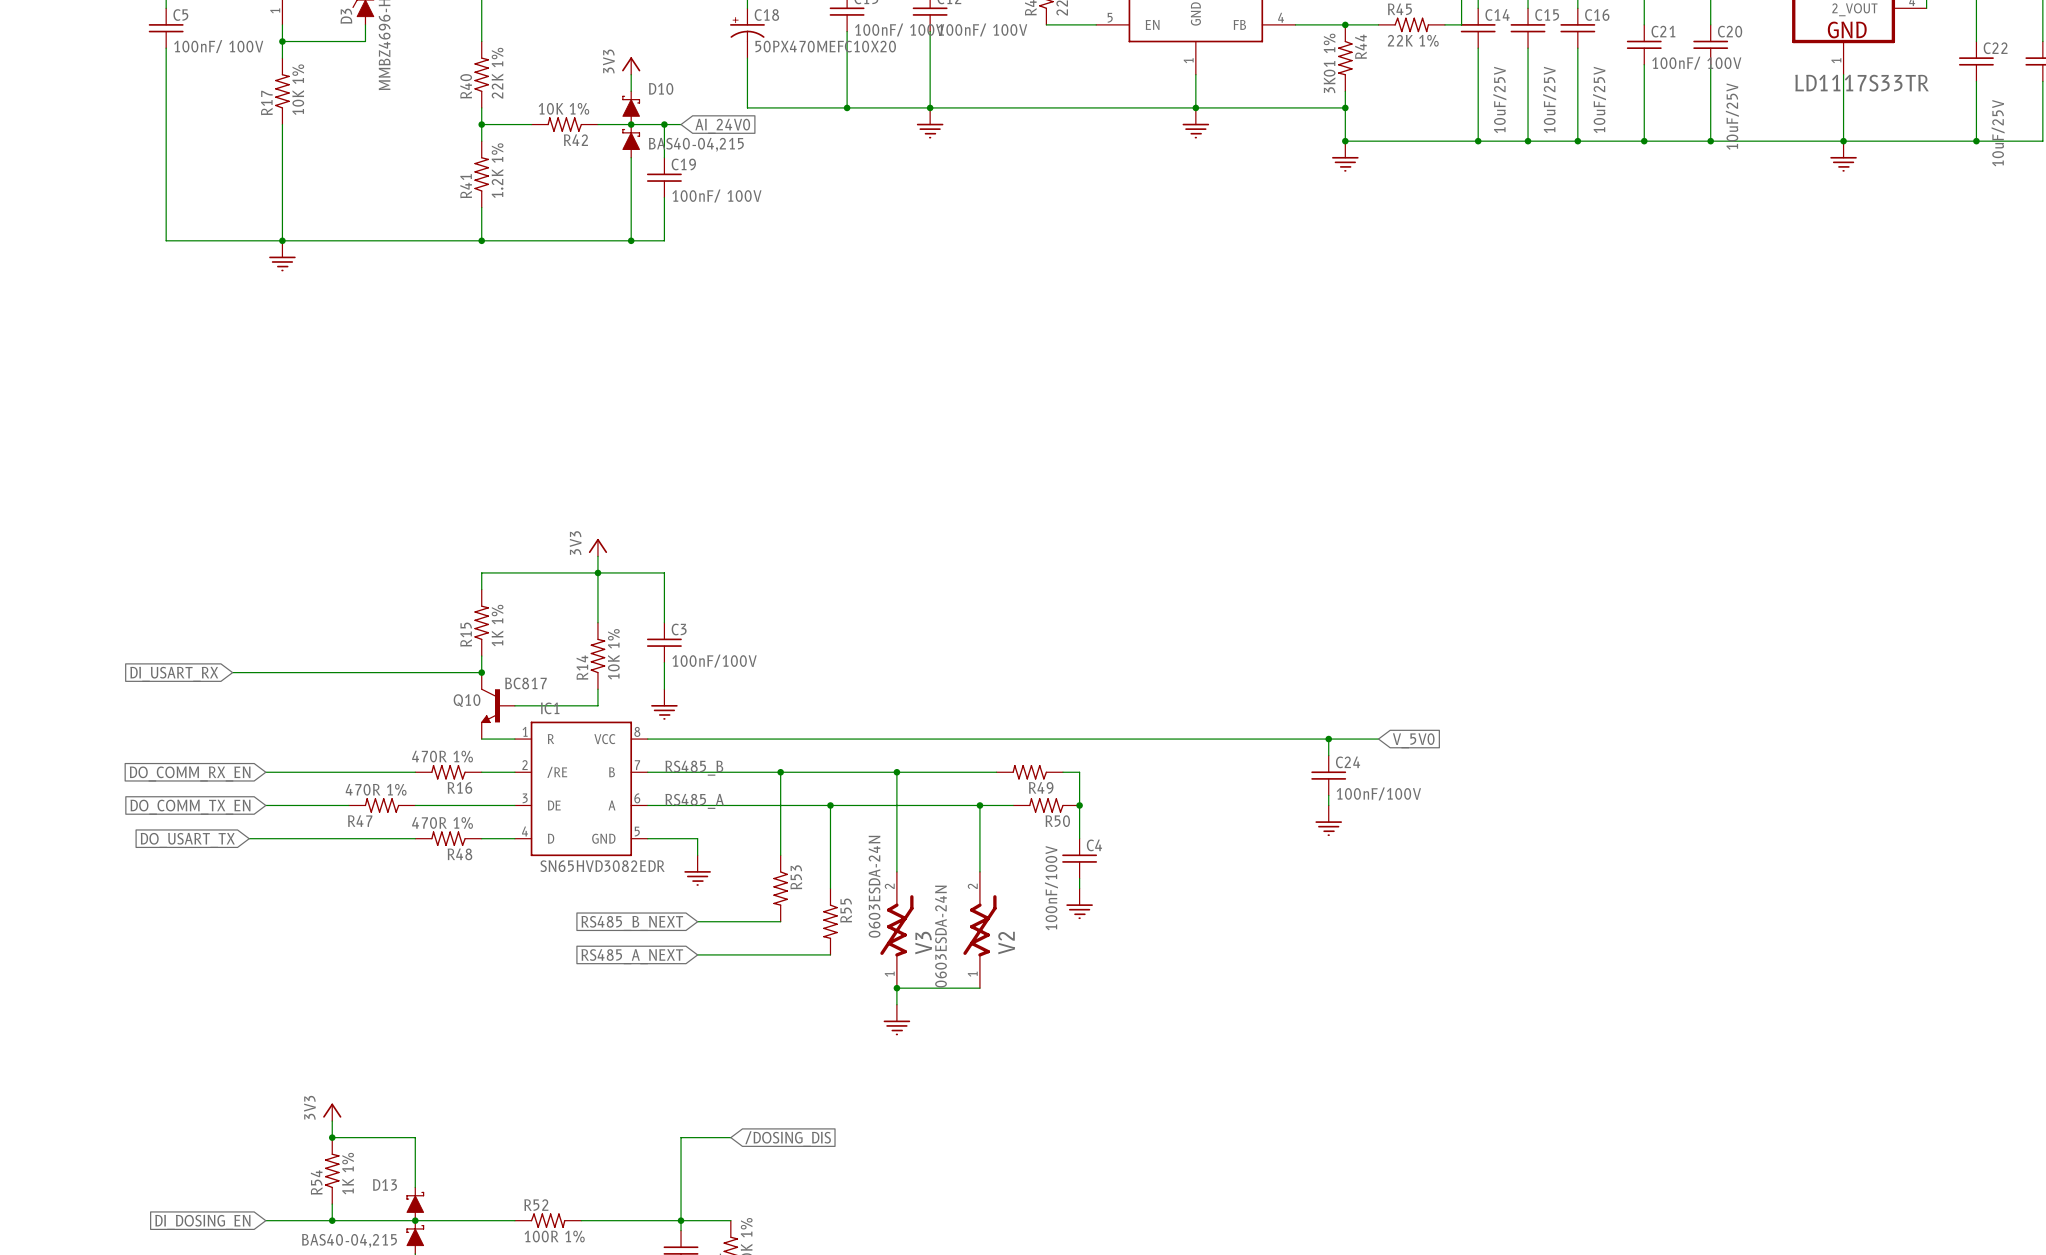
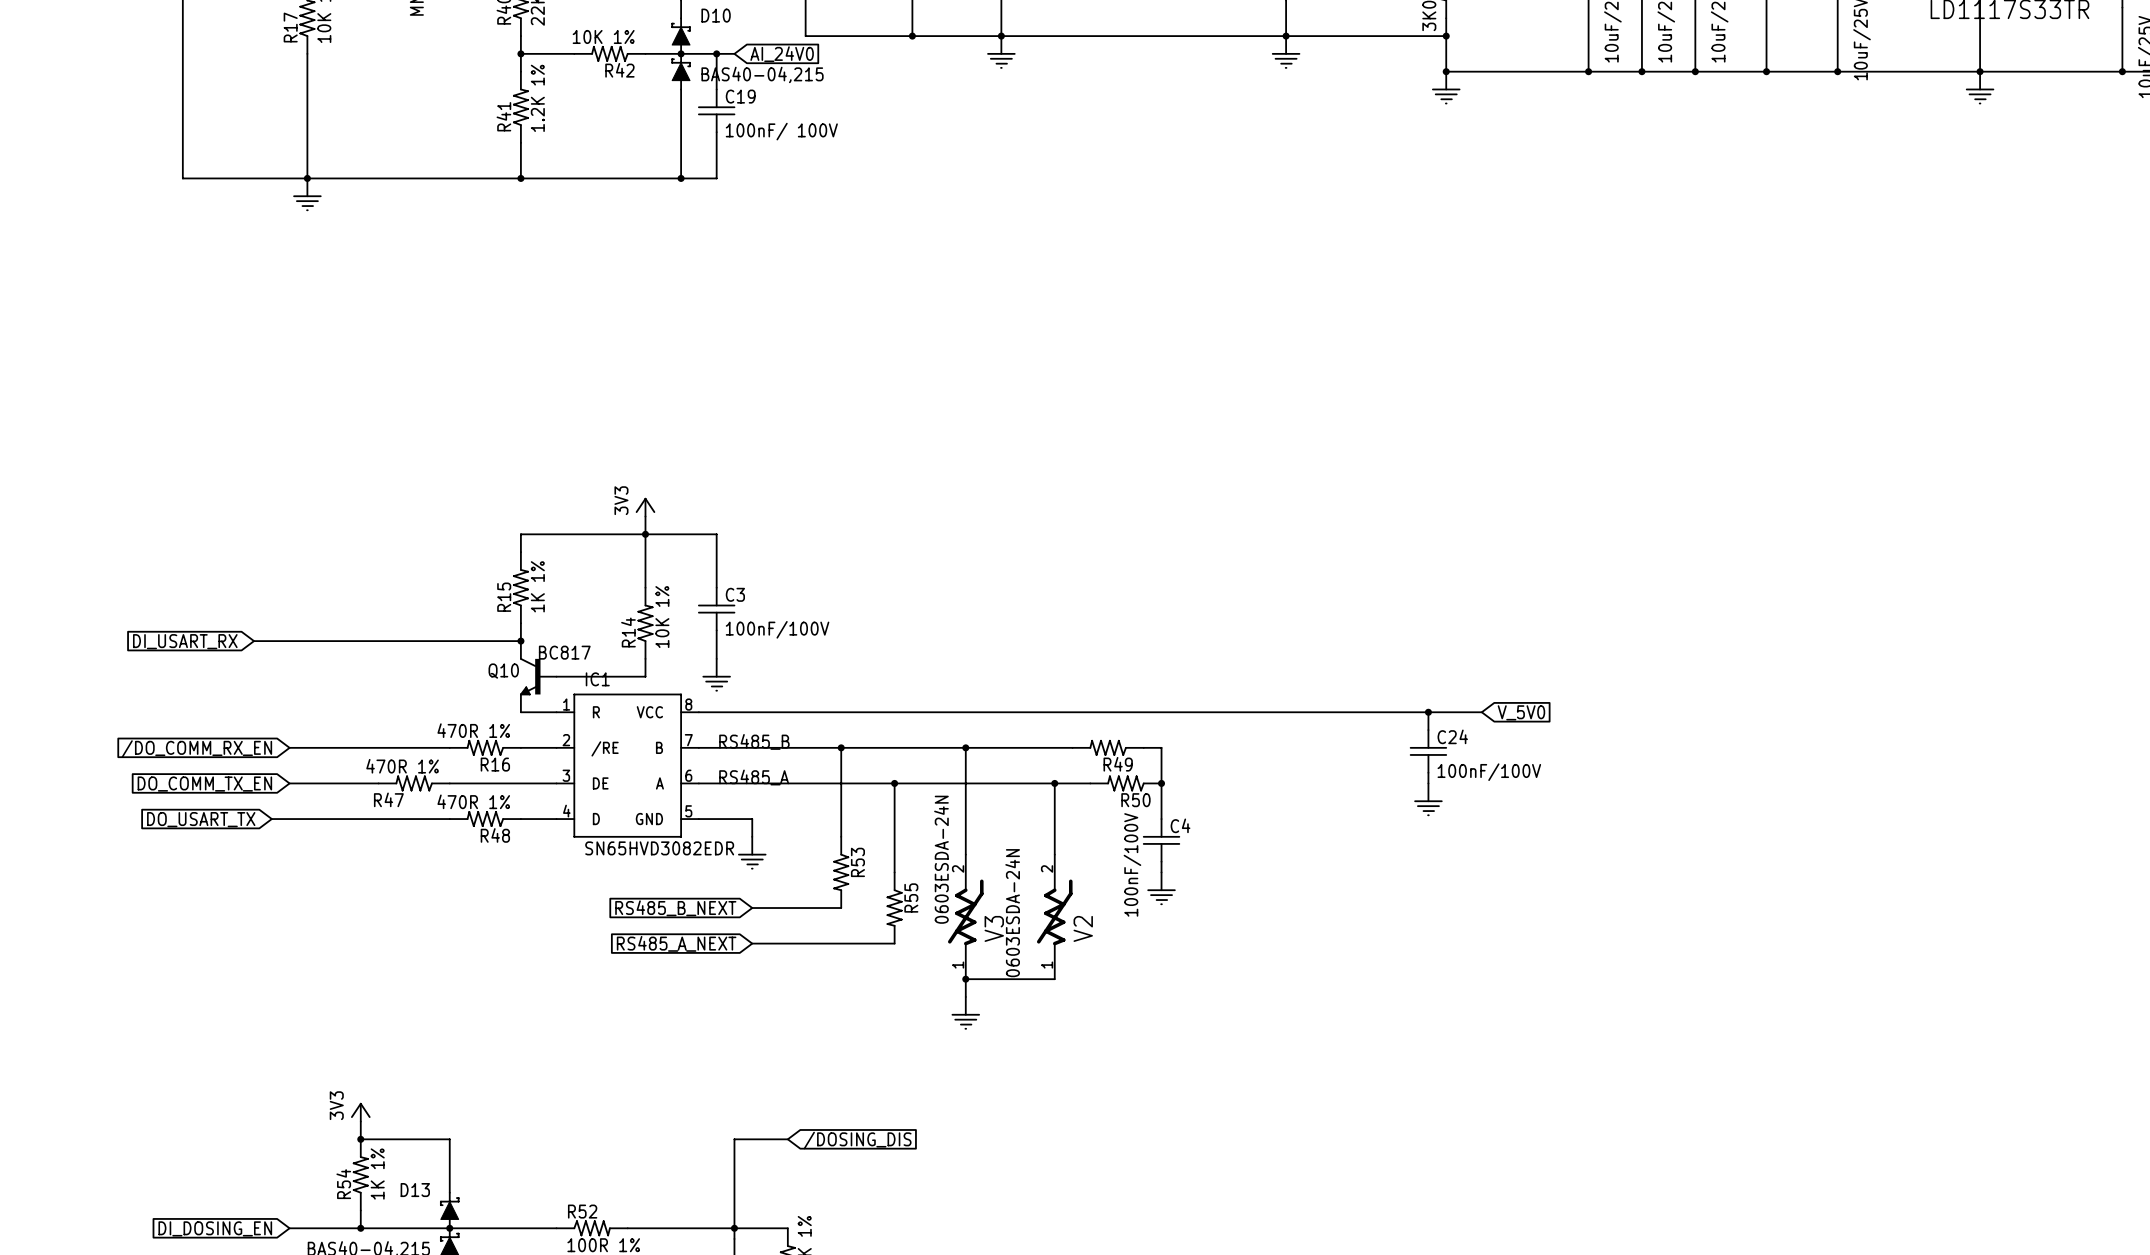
global label: DO_COMM_RX_EN (190, 774) -> /DO_COMM_RX_EN (196, 749)

